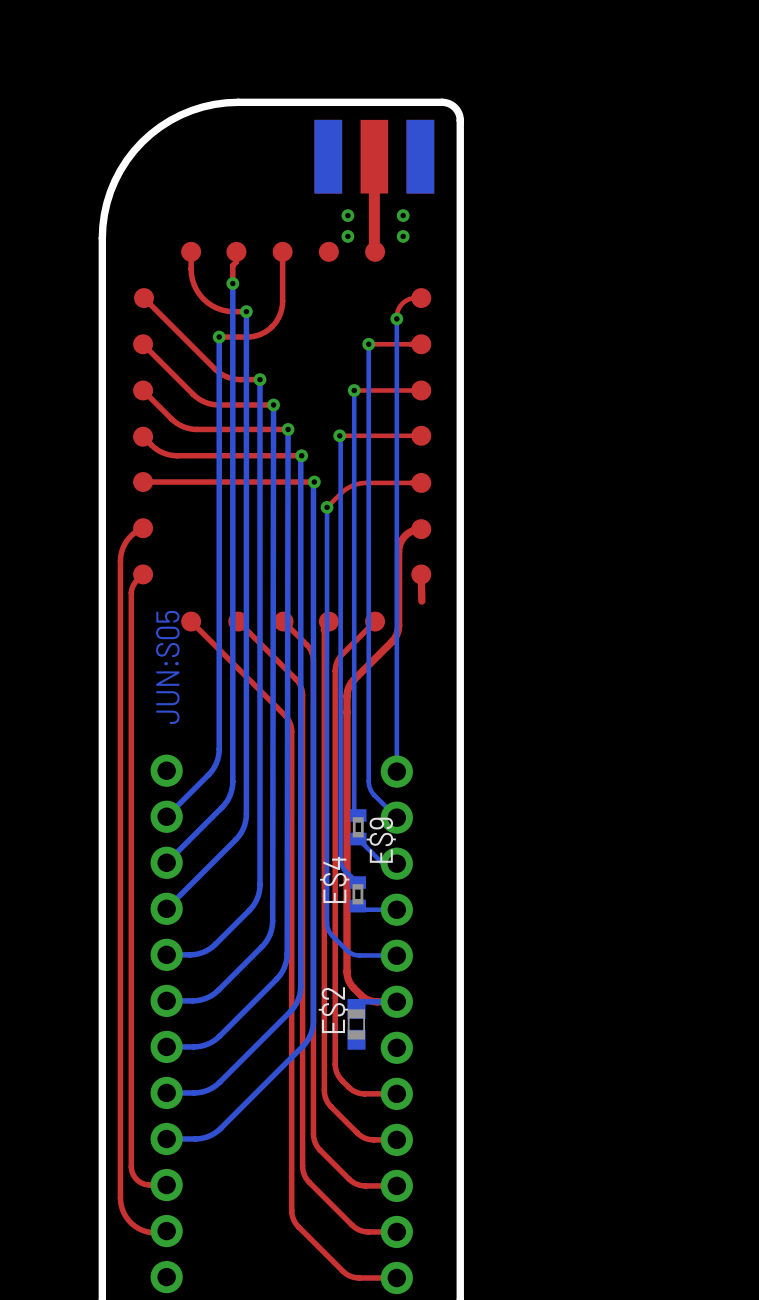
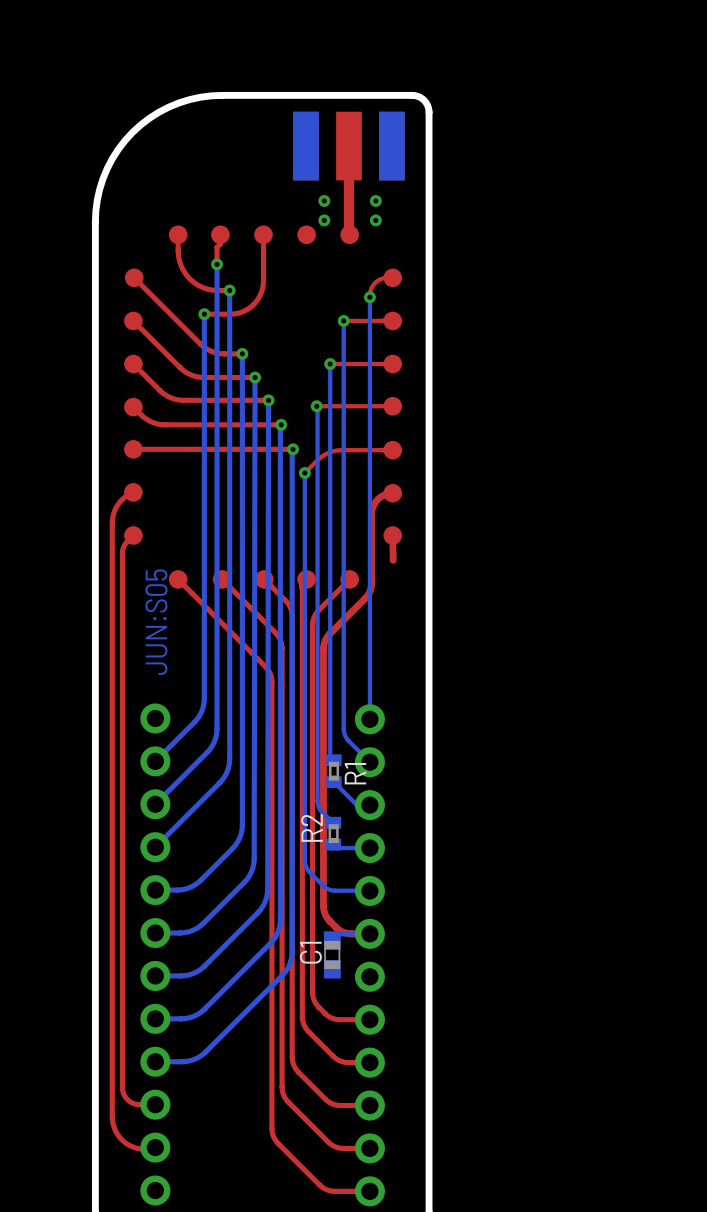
E$9 name: E$9 (381, 840) -> R1 (355, 773)
E$4 name: E$4 (334, 879) -> R2 (312, 828)
E$2 name: E$2 (333, 1010) -> C1 (310, 952)

